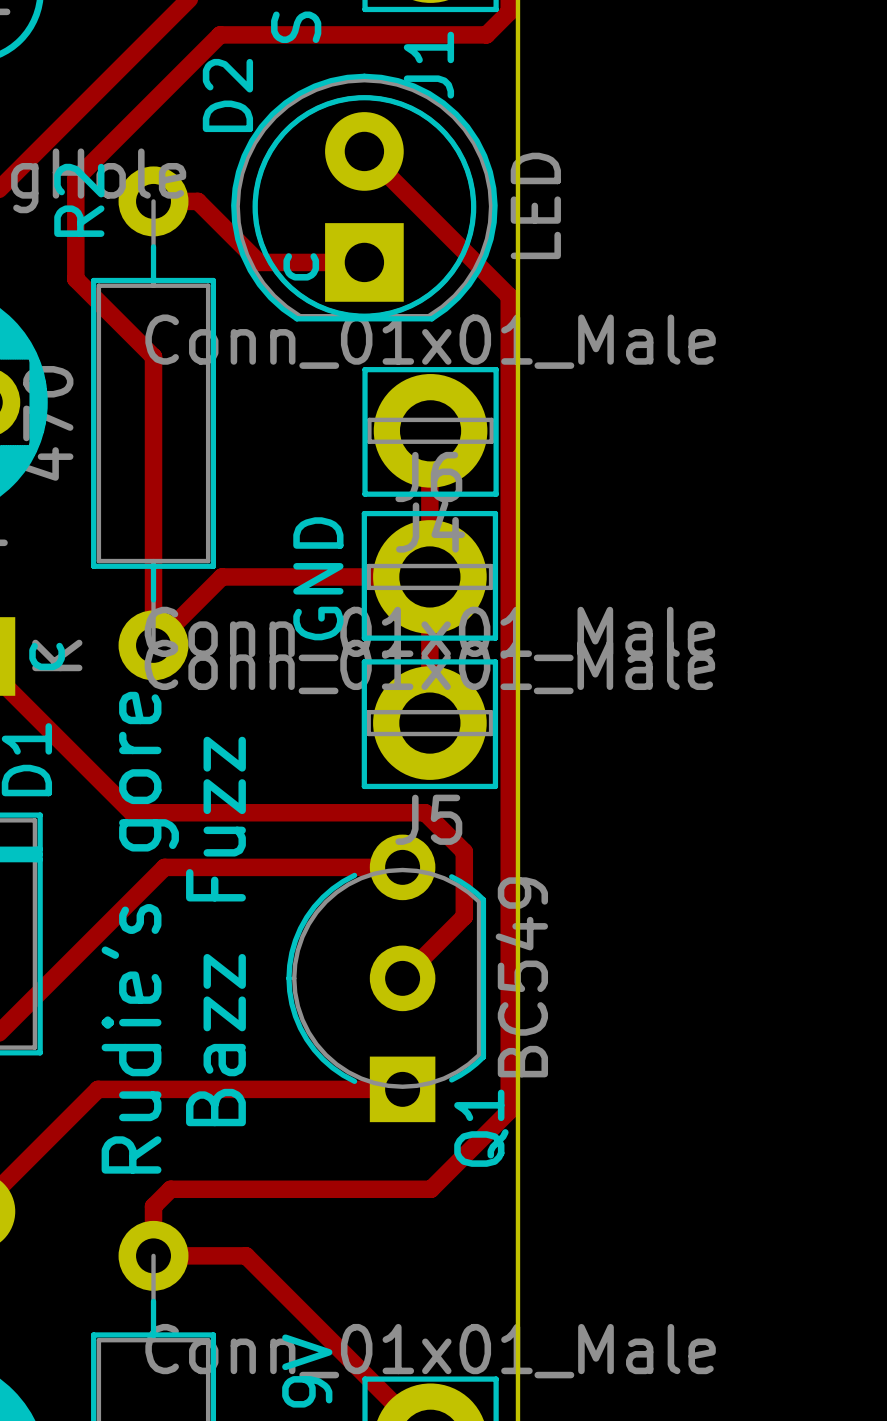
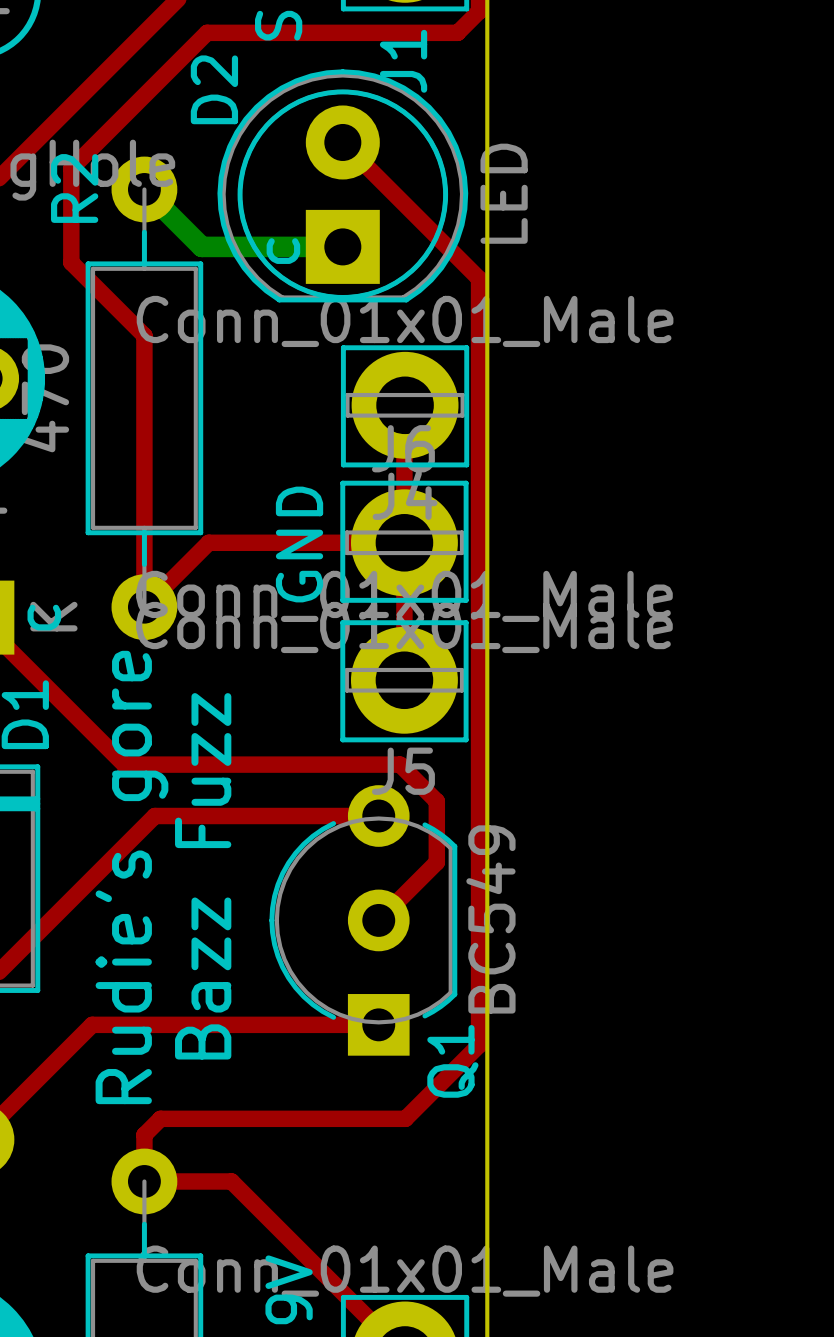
top track: (153, 201) (197, 201) (258, 262) (364, 262) -> none
bottom track: none -> (144, 189) (201, 246) (342, 246)

